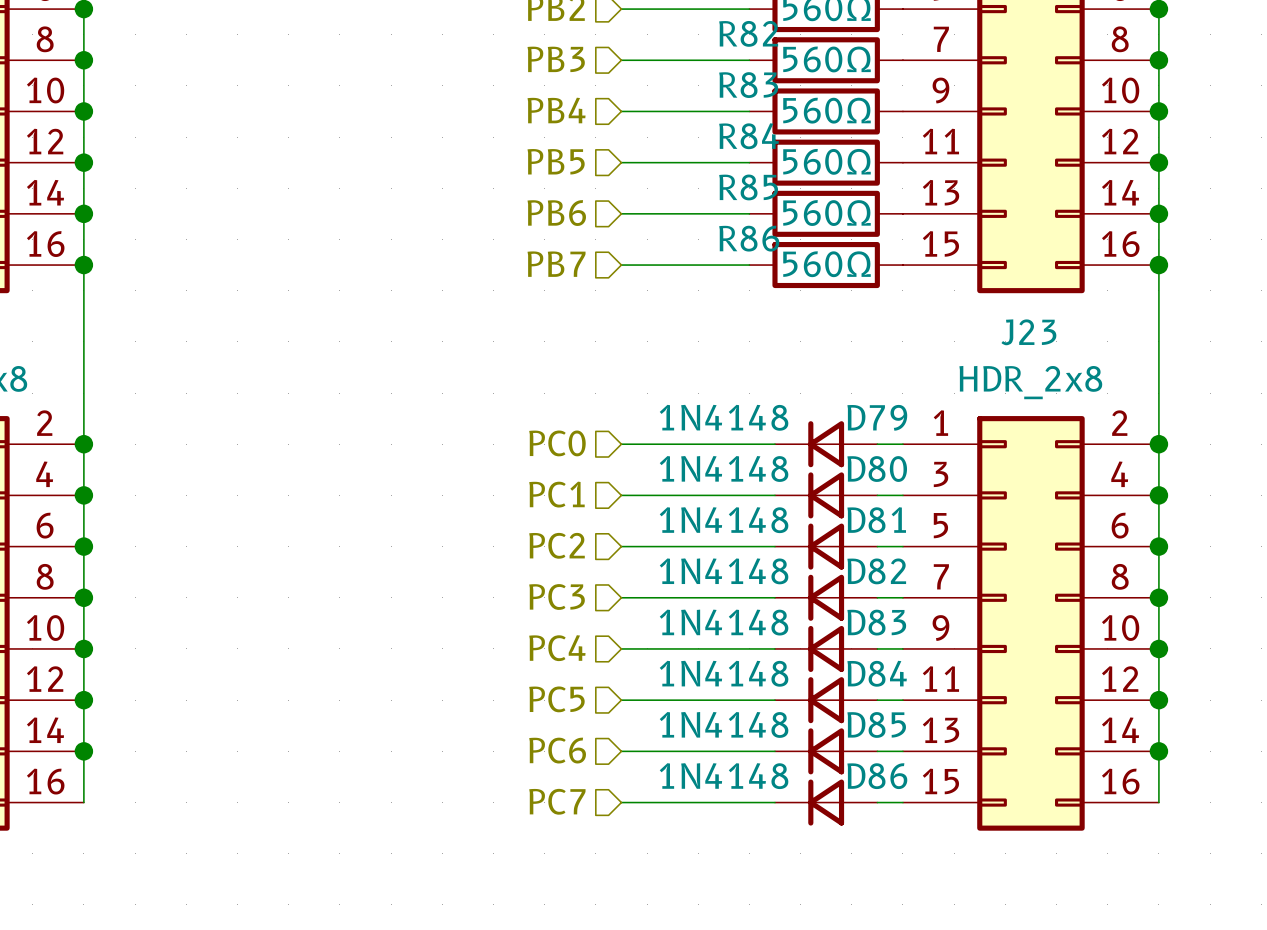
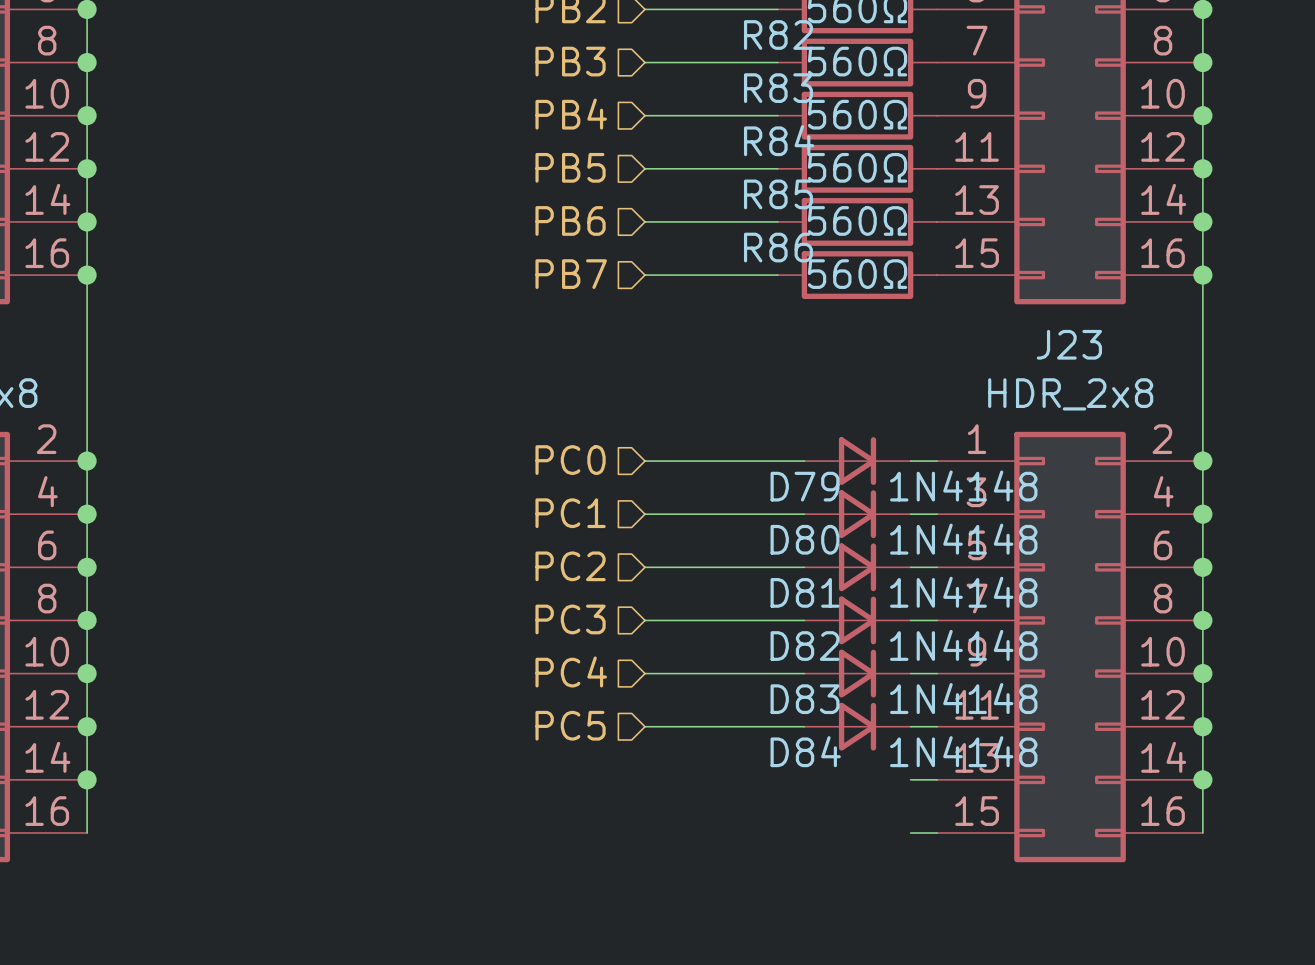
D79 rotation: 0° (826, 444) -> 180° (857, 461)
D80 rotation: 0° (826, 495) -> 180° (857, 514)
D81 rotation: 0° (826, 546) -> 180° (857, 567)
D82 rotation: 0° (826, 597) -> 180° (857, 620)
D83 rotation: 0° (826, 648) -> 180° (857, 673)
D84 rotation: 0° (826, 700) -> 180° (857, 726)
hierarchical label: PC6 (557, 750) -> none
wire: (621, 751) (774, 751) -> none
D85: 1N4148 (826, 751) -> none
hierarchical label: PC7 (557, 801) -> none
wire: (621, 802) (774, 802) -> none
D86: 1N4148 (826, 802) -> none

